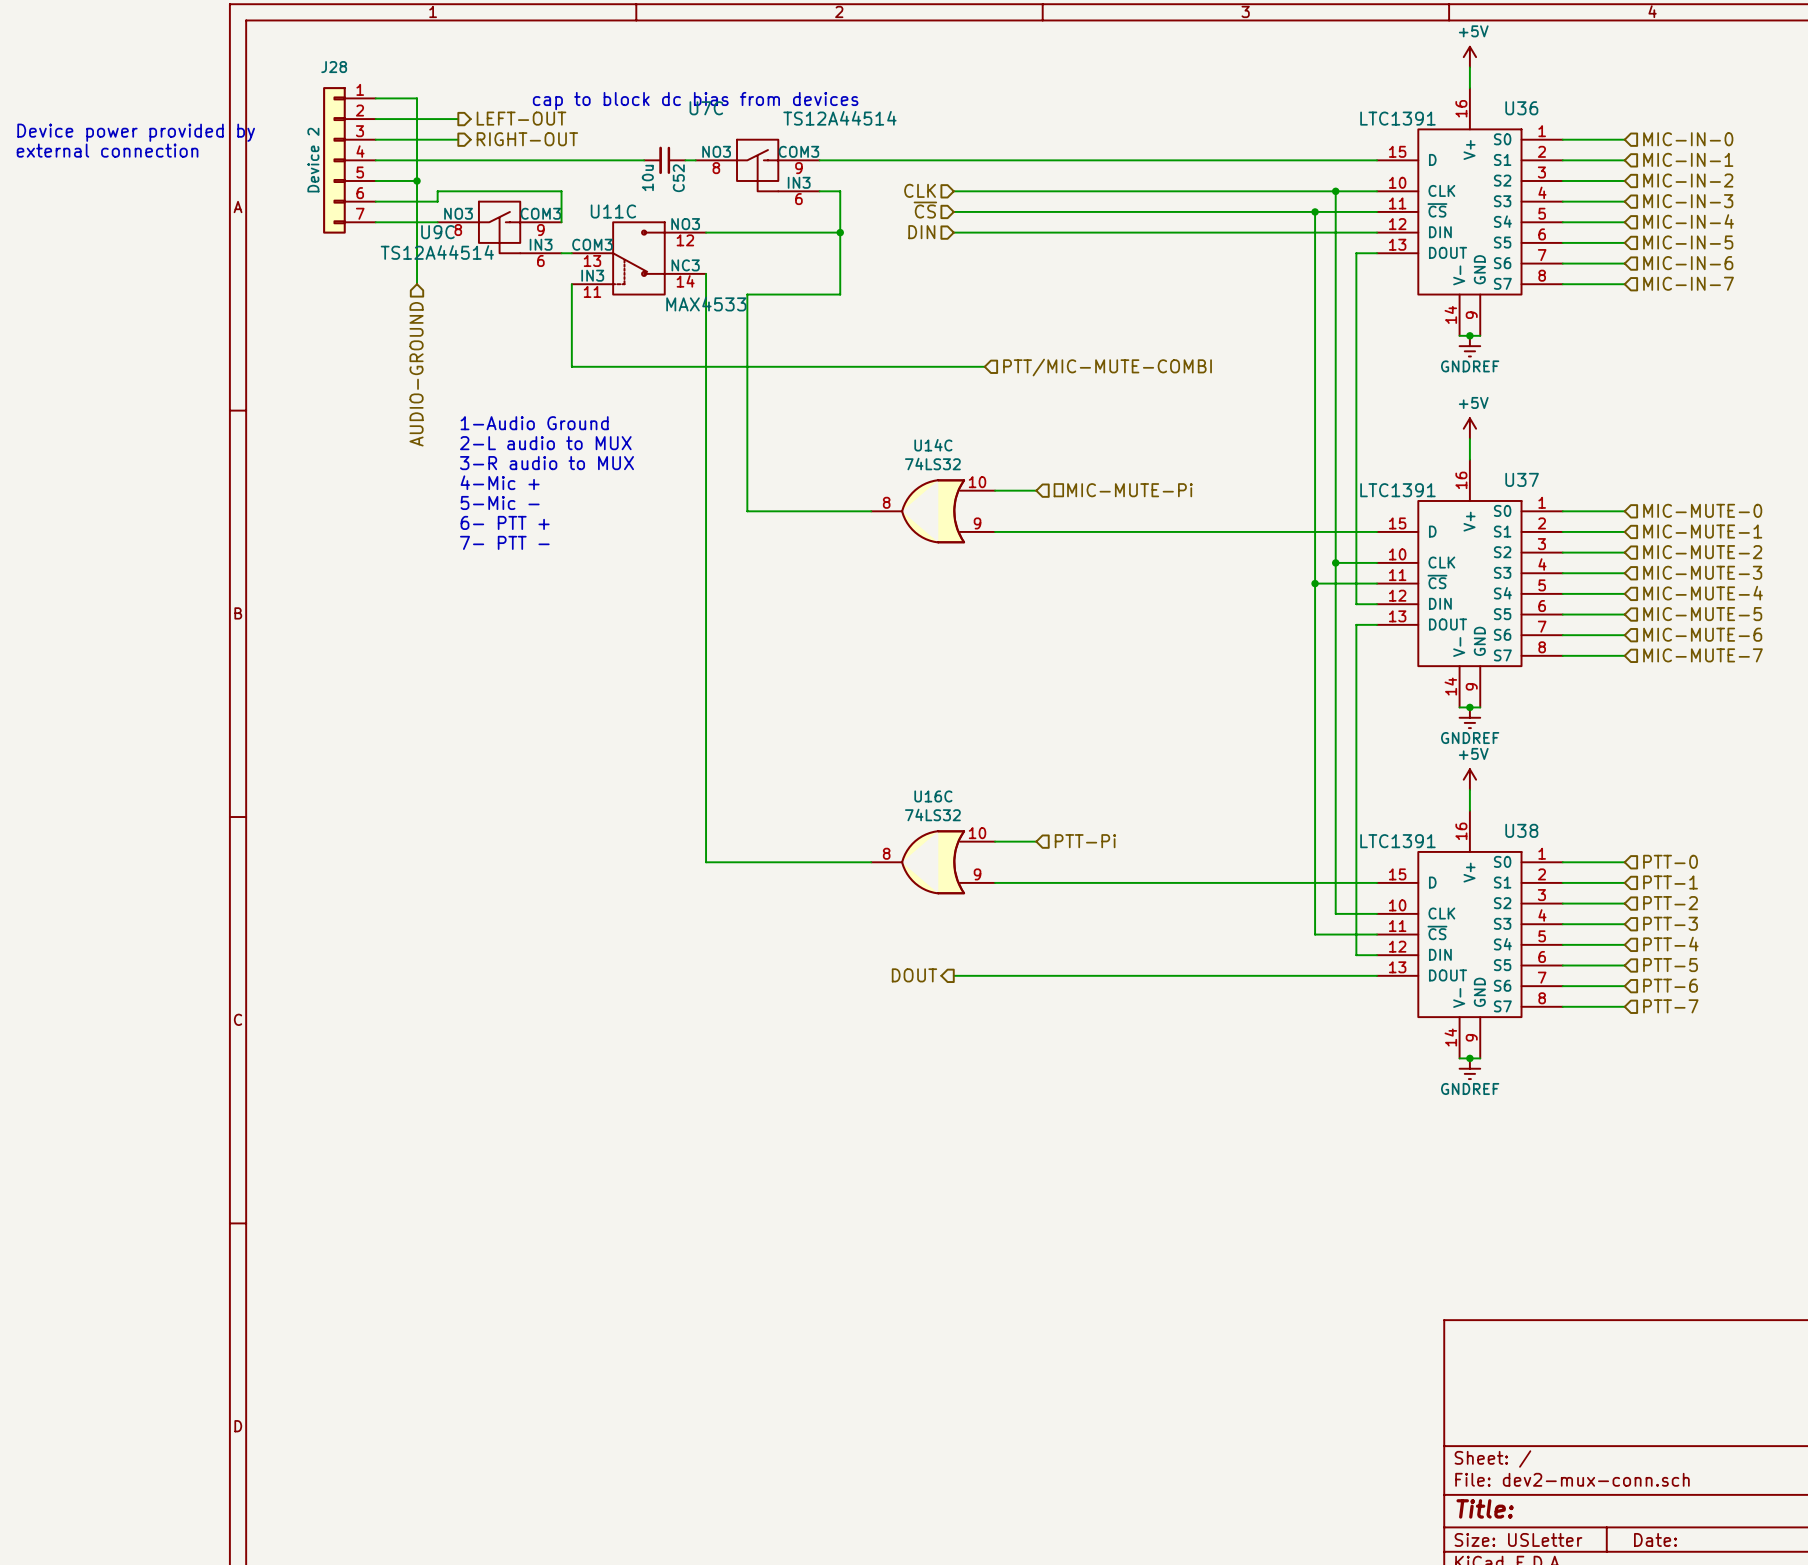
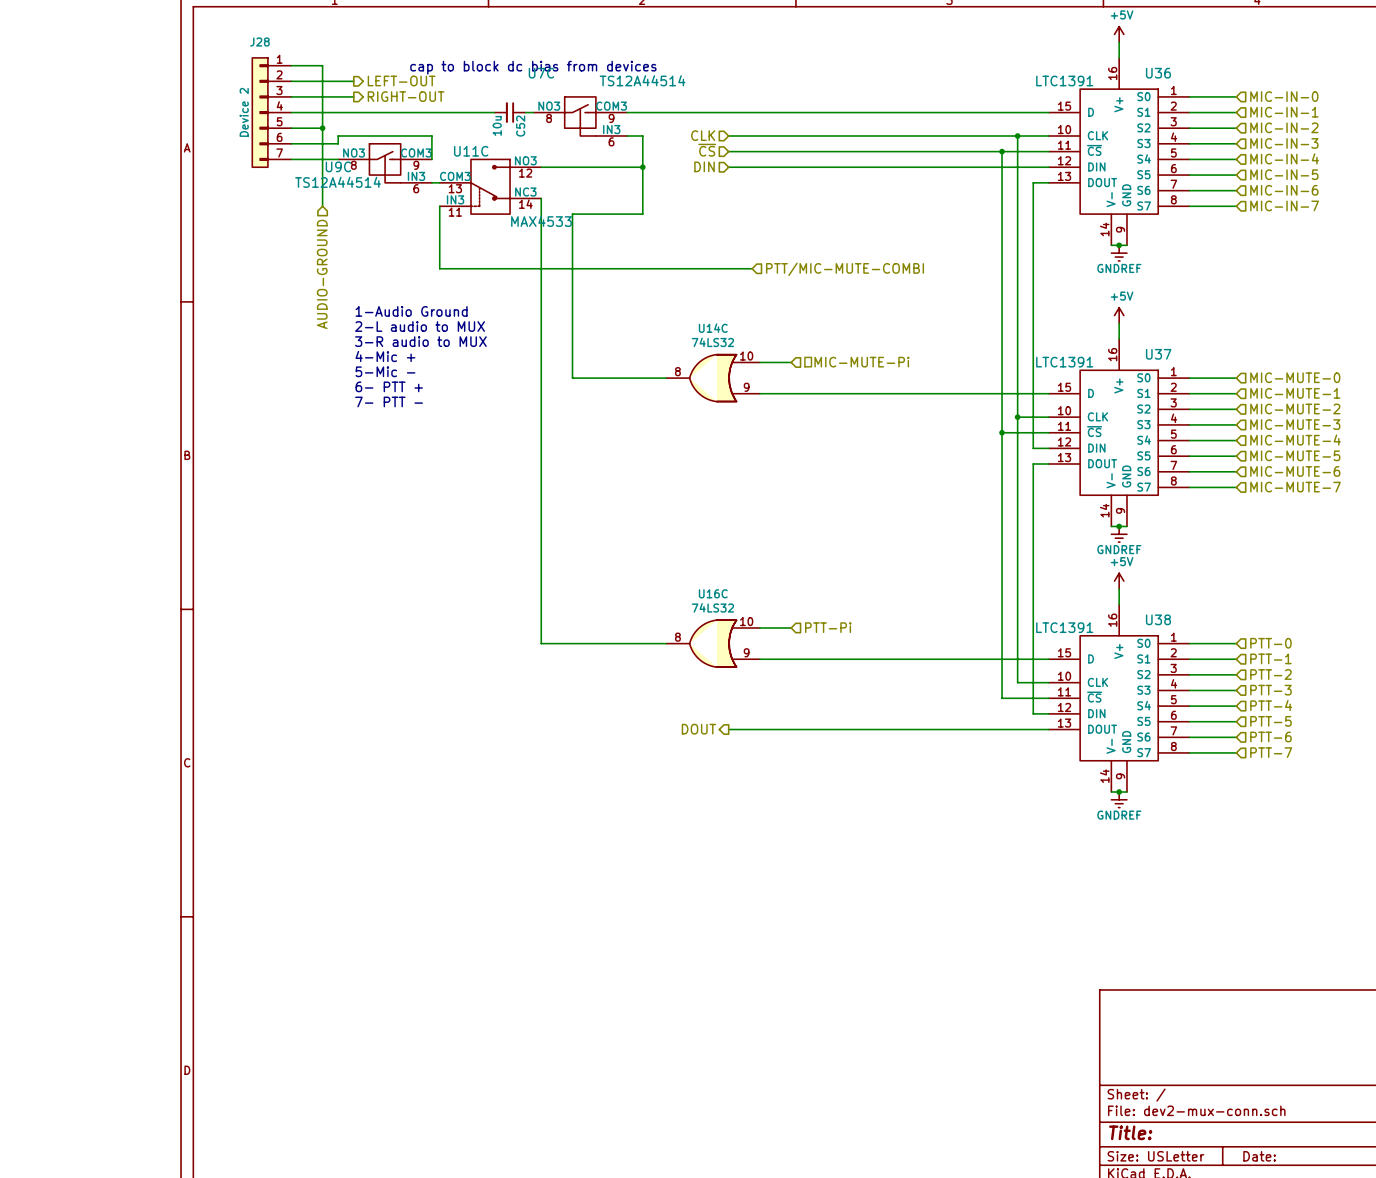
text: Device power provided by (136, 132) -> none
text: external connection (107, 150) -> none

